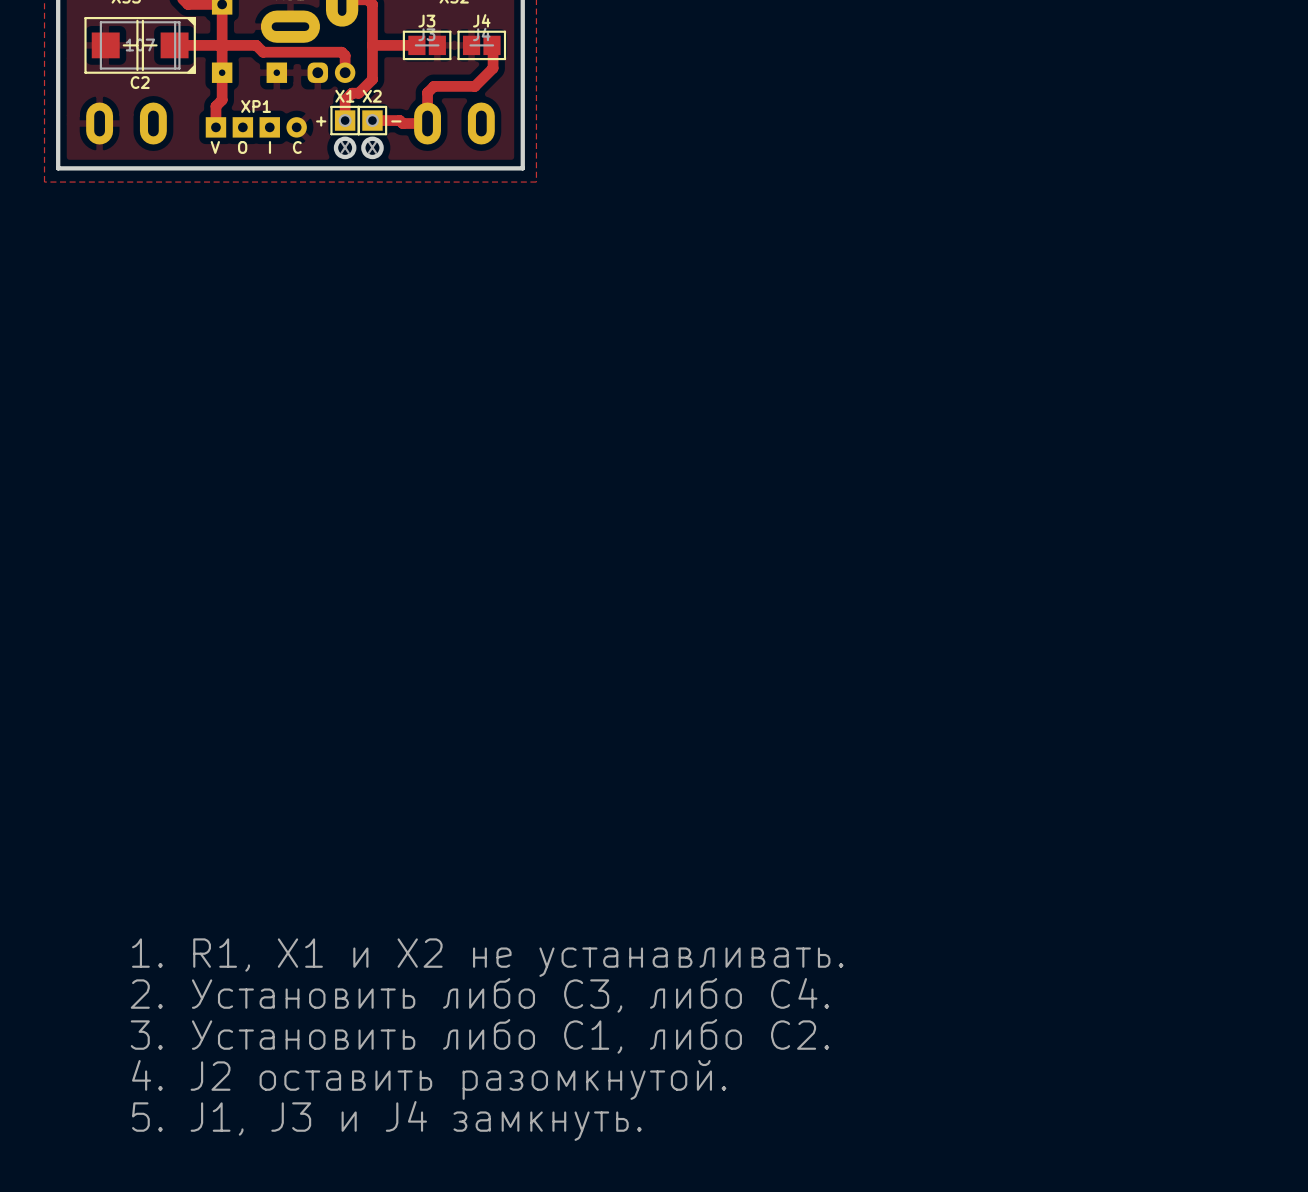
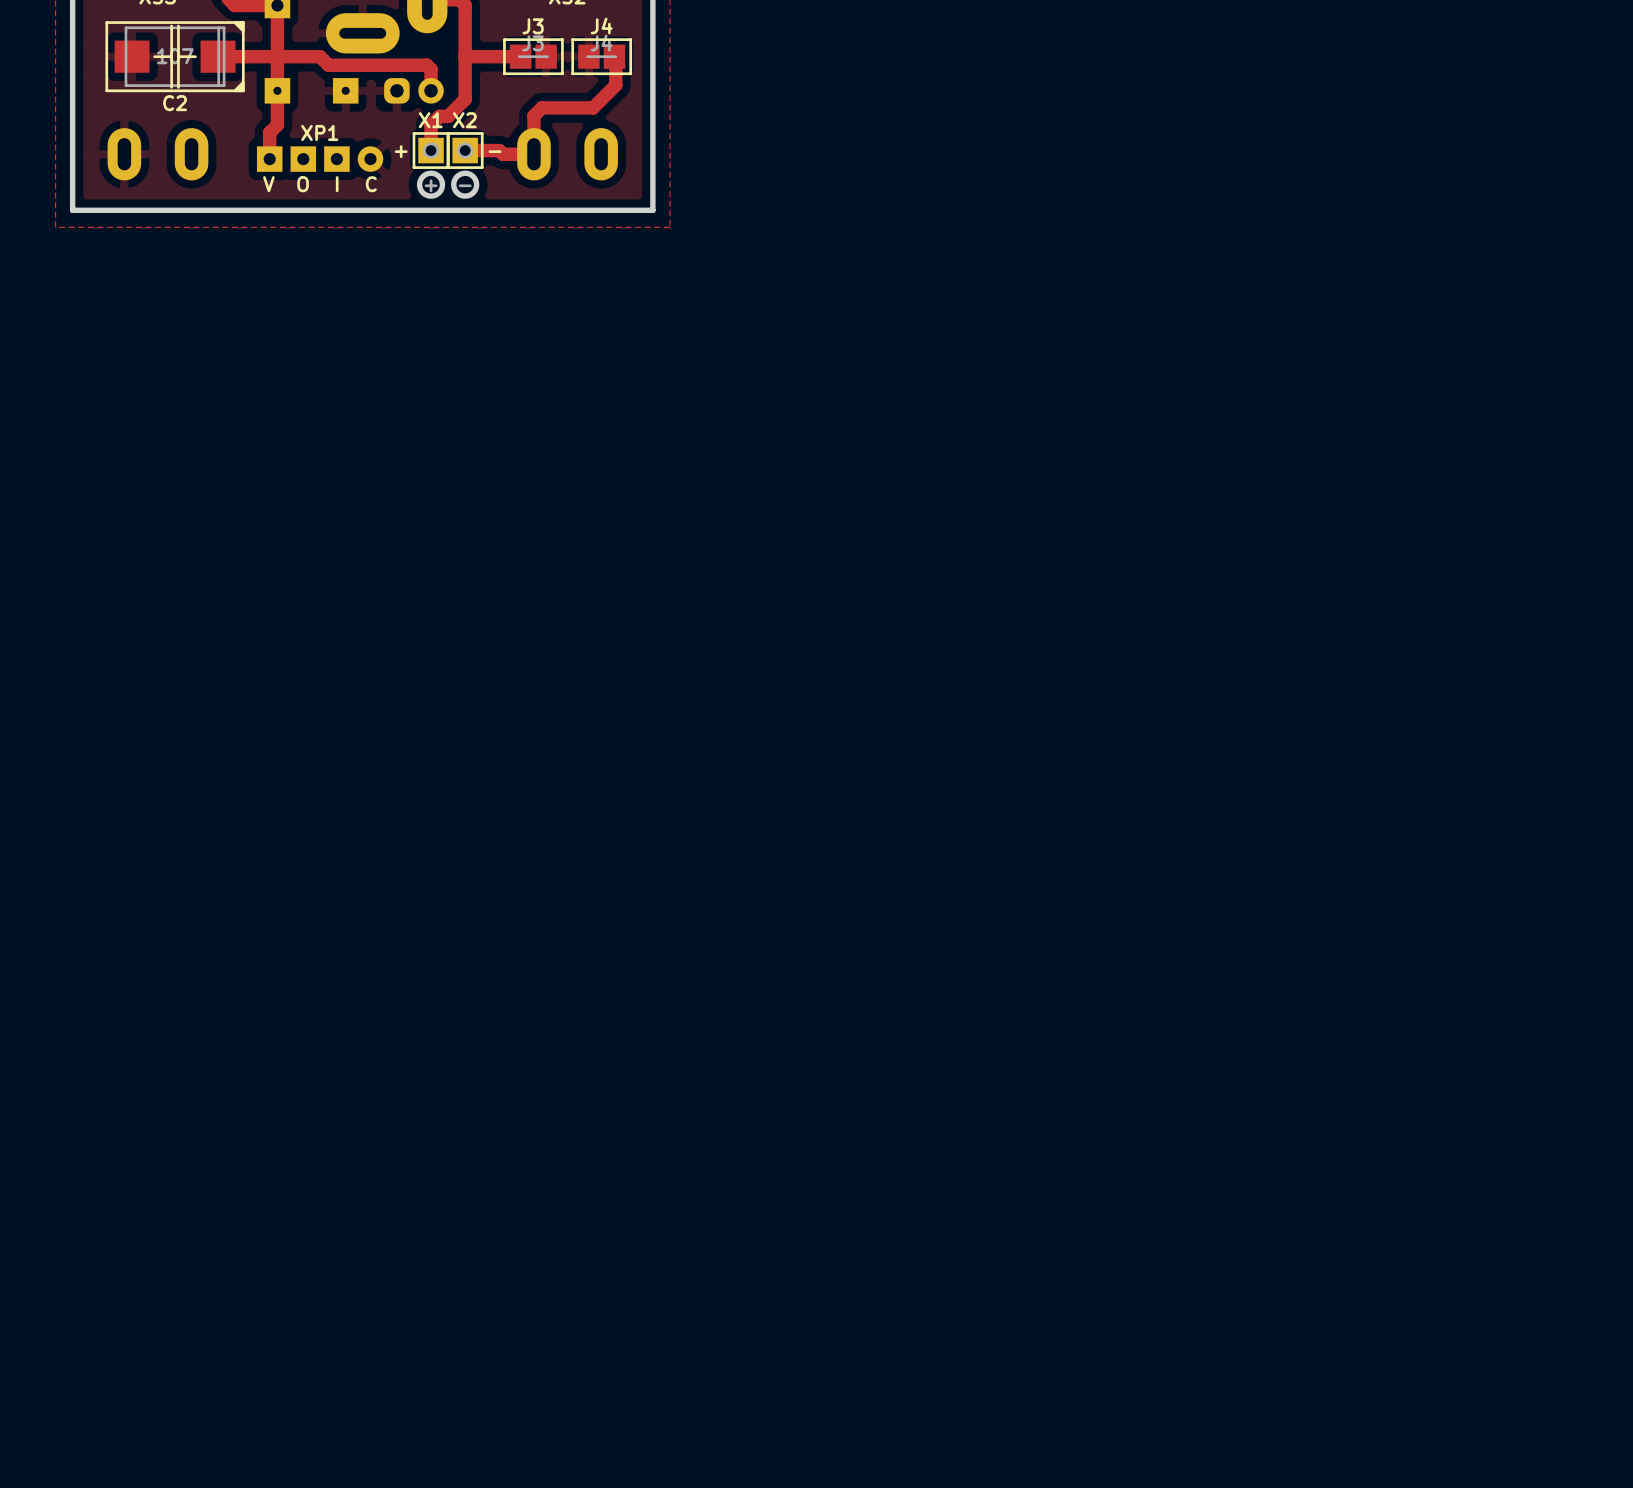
X1 value: X (345, 147) -> + (431, 185)
X2 value: X (372, 147) -> - (465, 185)
text: 1. R1, X1 и X2 не устанавливать. (487, 957) -> none
text: 2. Установить либо C3, либо C4. (479, 995) -> none
text: 3. Установить либо C1, либо C2. (479, 1036) -> none
text: 4. J2 оставить разомкнутой. (429, 1079) -> none
text: 5. J1, J3 и J4 замкнуть. (386, 1120) -> none

